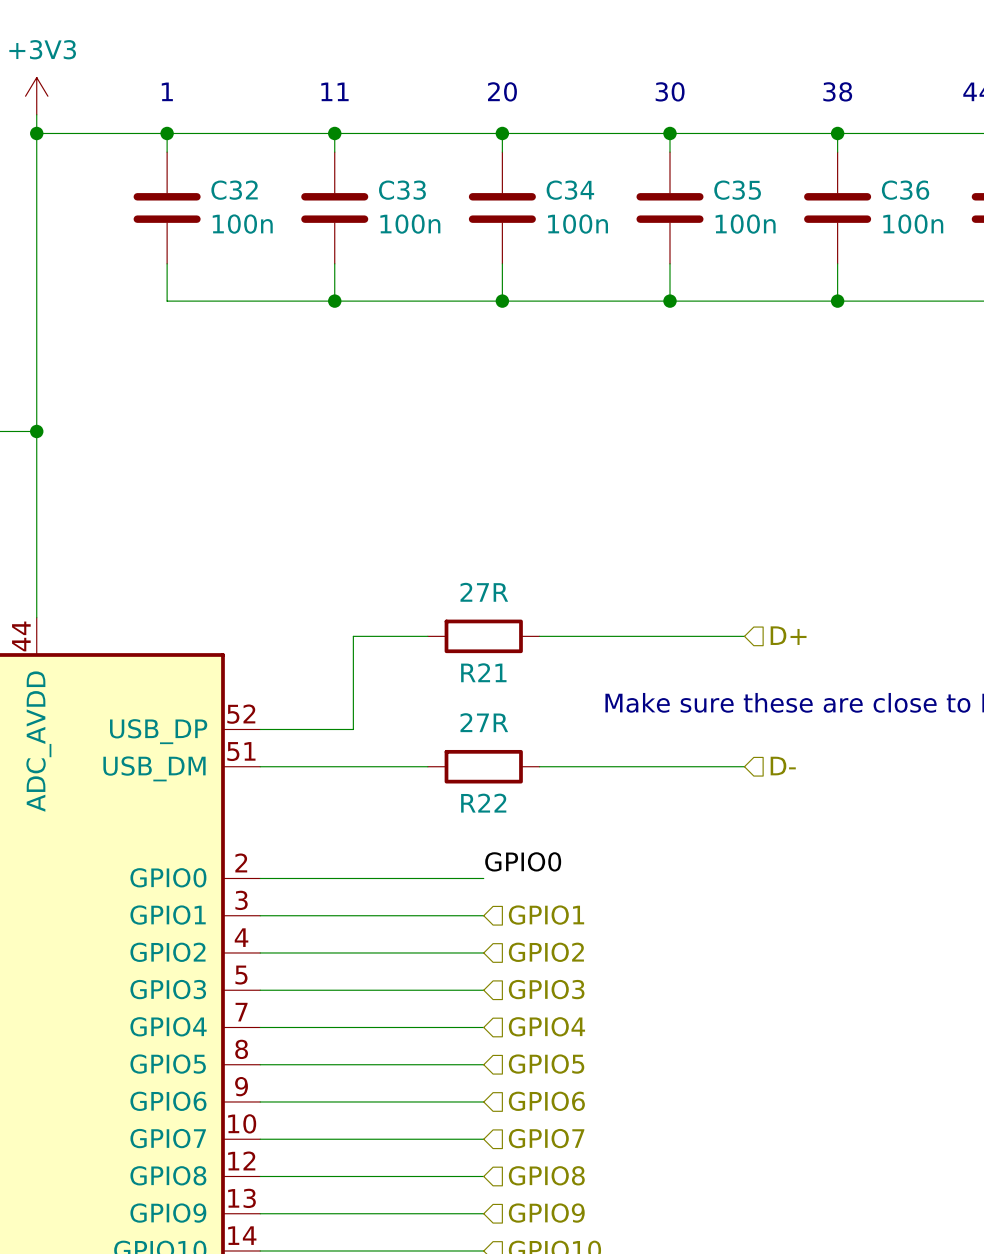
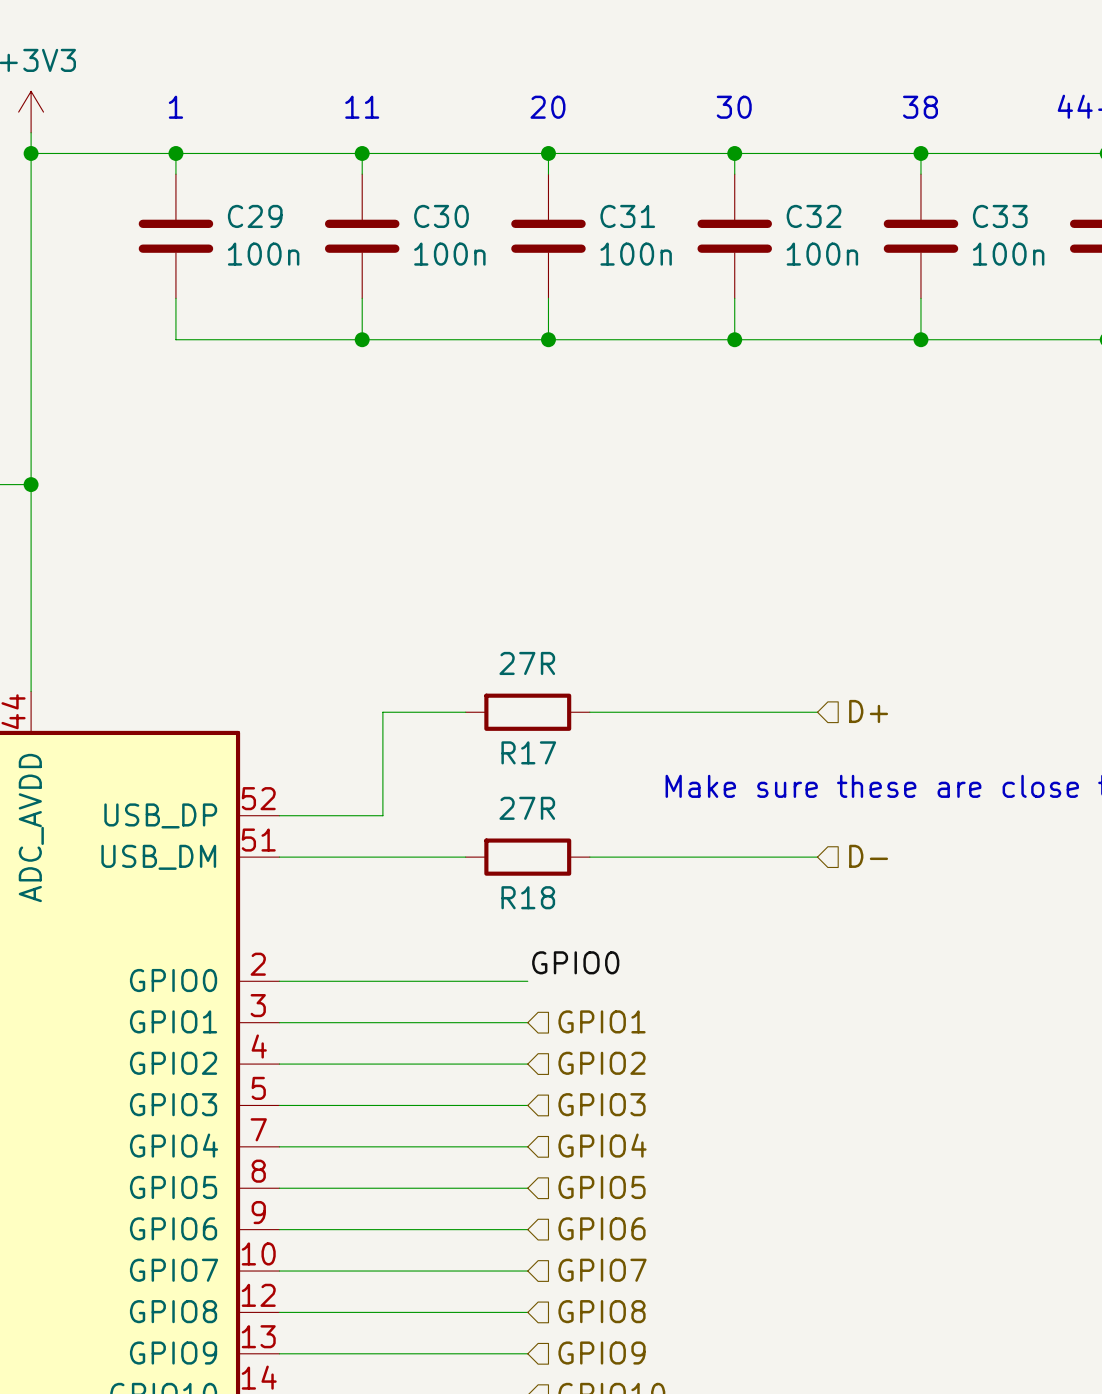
C32 name: C32 (234, 190) -> C29 (255, 216)
C33 name: C33 (402, 190) -> C30 (441, 216)
C34 name: C34 (570, 190) -> C31 (627, 216)
C35 name: C35 (737, 190) -> C32 (814, 216)
C36 name: C36 (905, 190) -> C33 (1000, 216)
R21 name: R21 (483, 672) -> R17 (528, 752)
R22 name: R22 (483, 803) -> R18 (528, 897)

